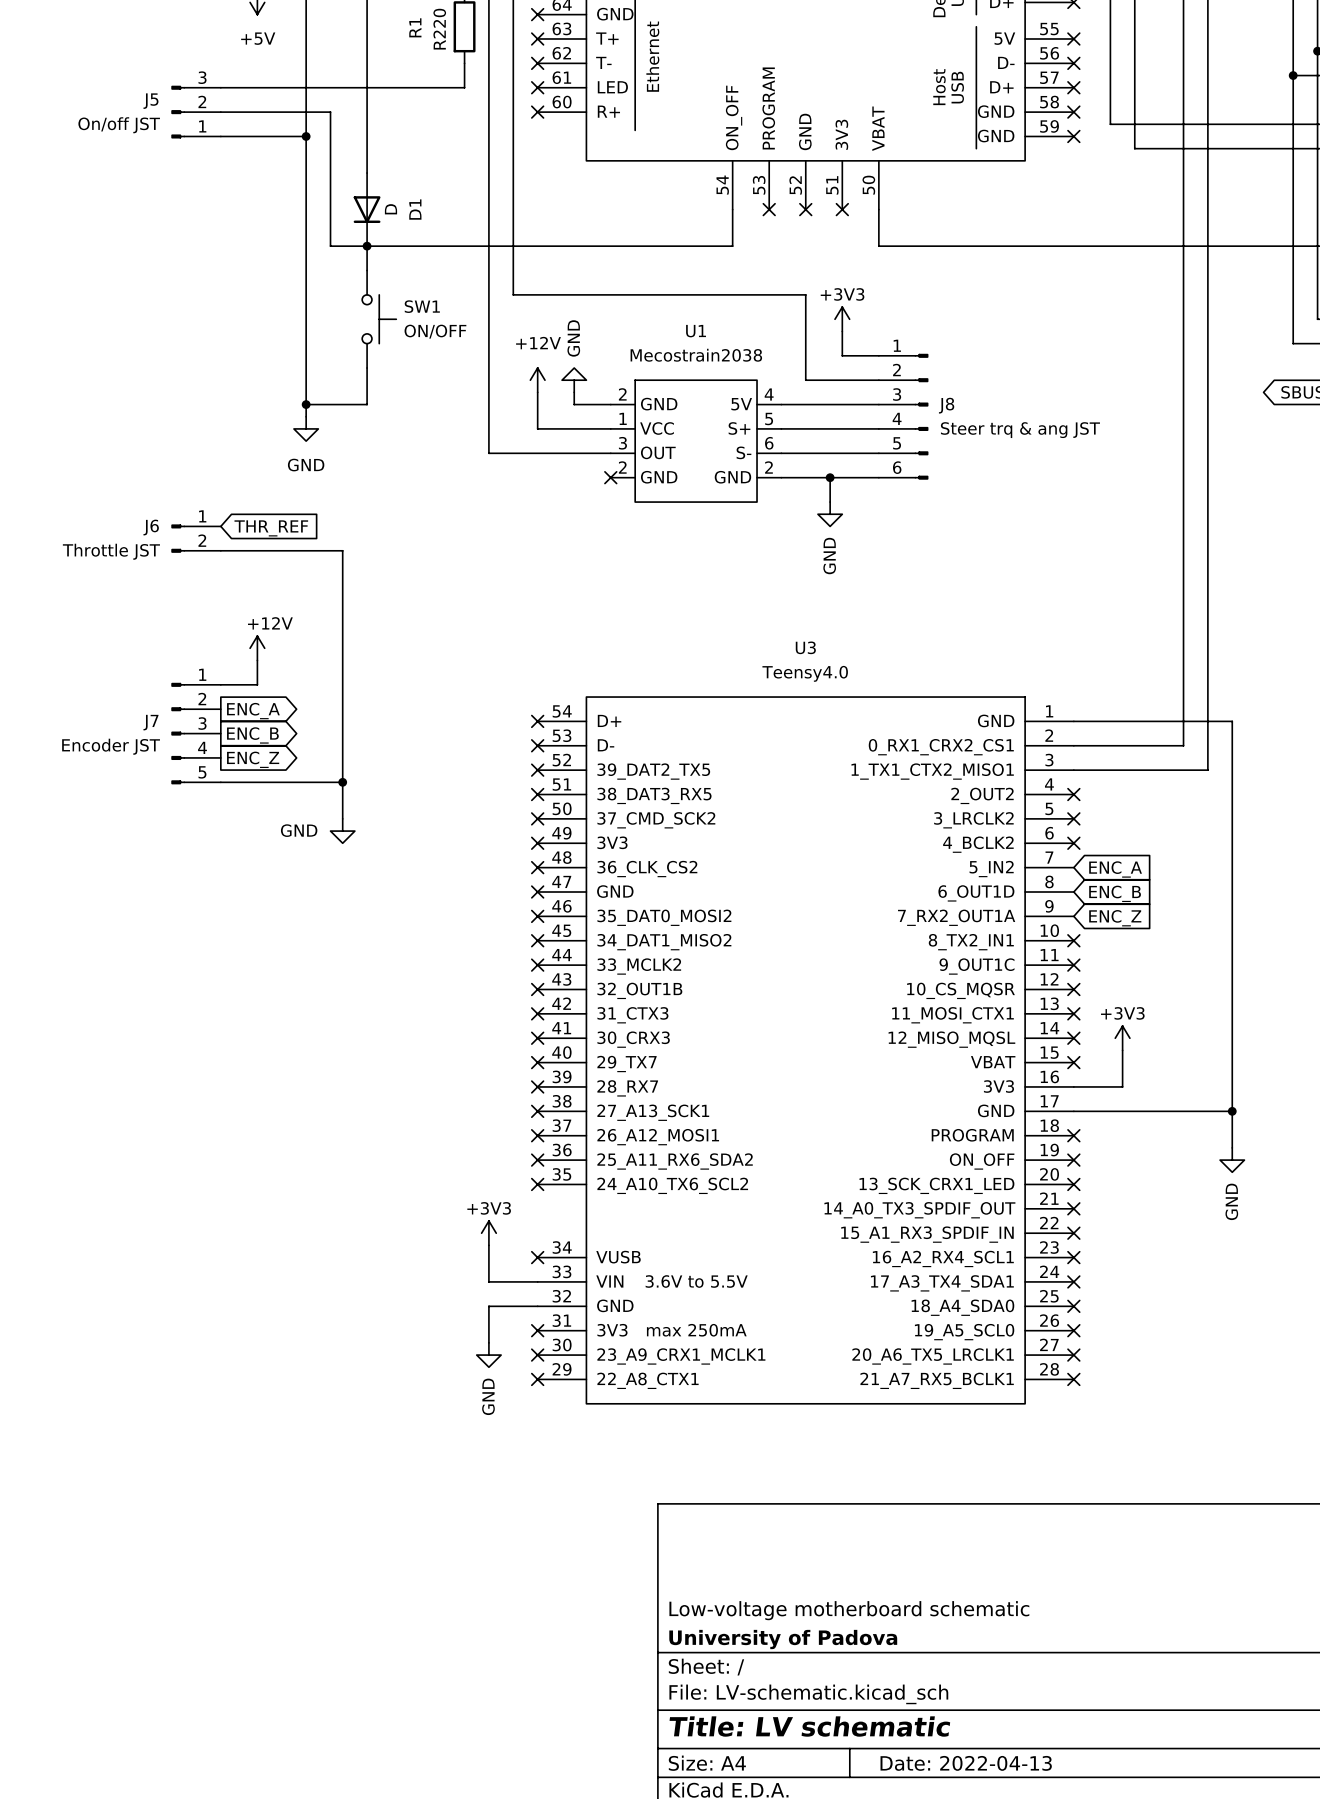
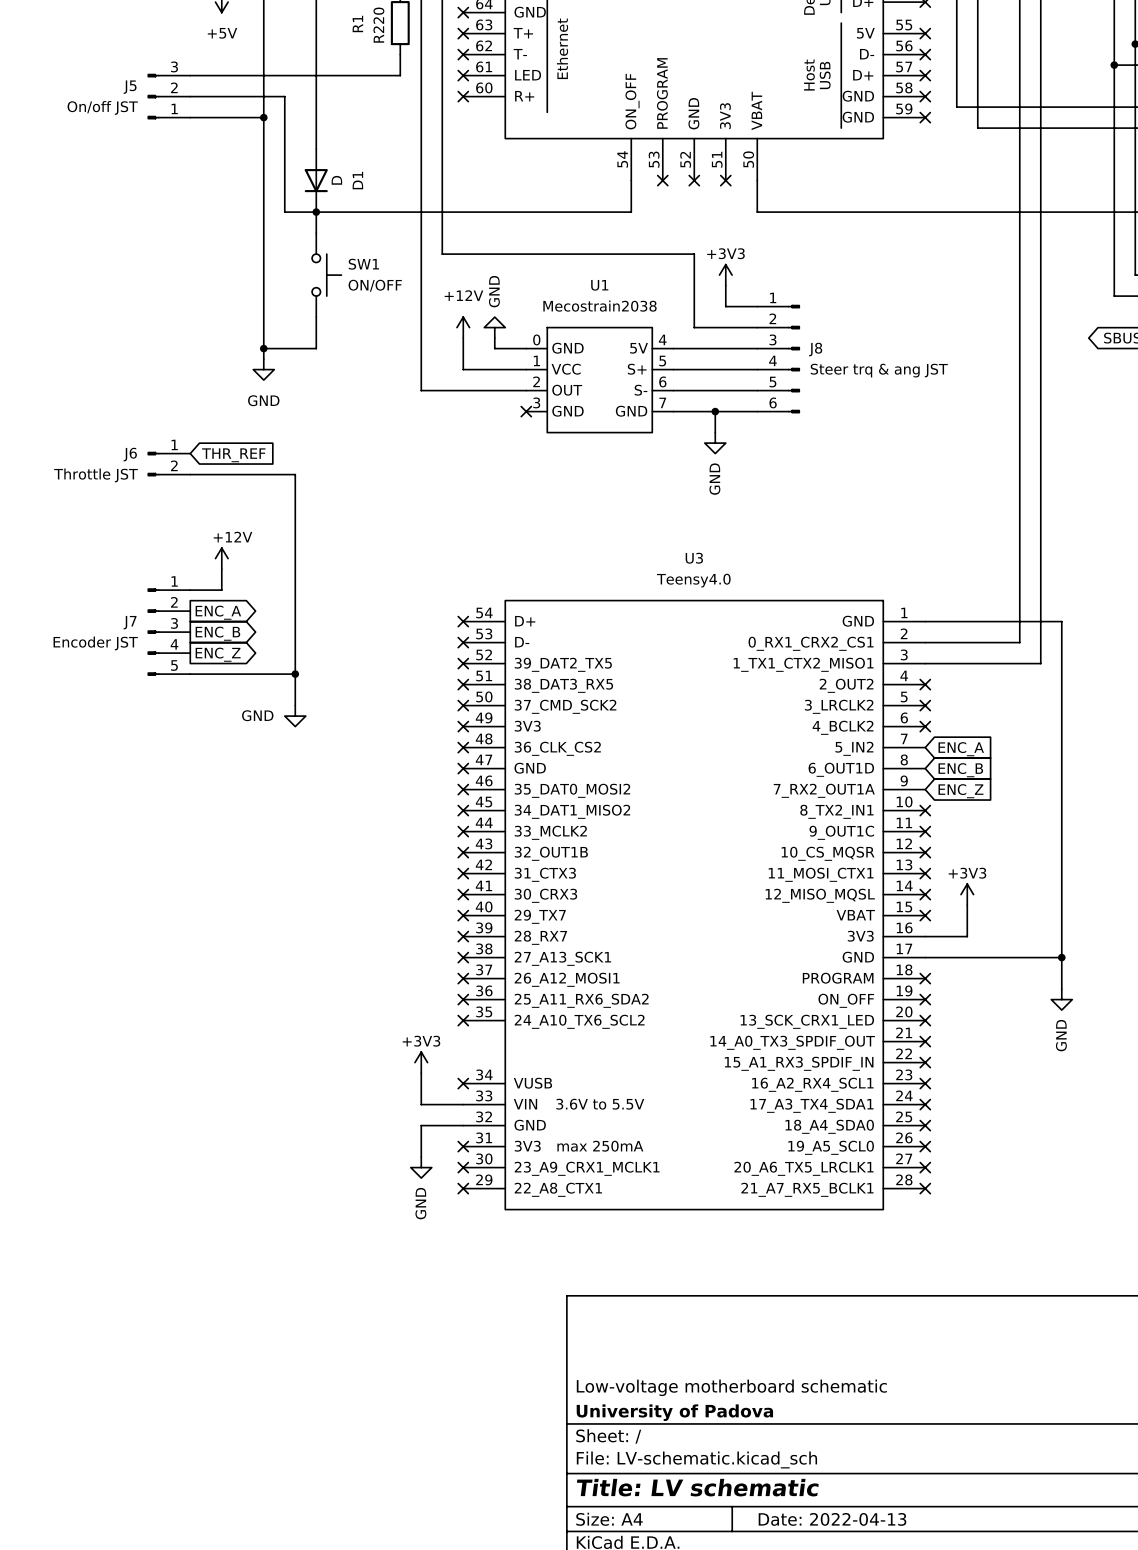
U1 pin number: 2 (622, 394) -> 0 (536, 339)
U1 pin number: 3 (622, 443) -> 2 (536, 381)
U1 pin number: 2 (622, 467) -> 3 (536, 402)
U1 pin number: 2 (768, 467) -> 7 (662, 402)

